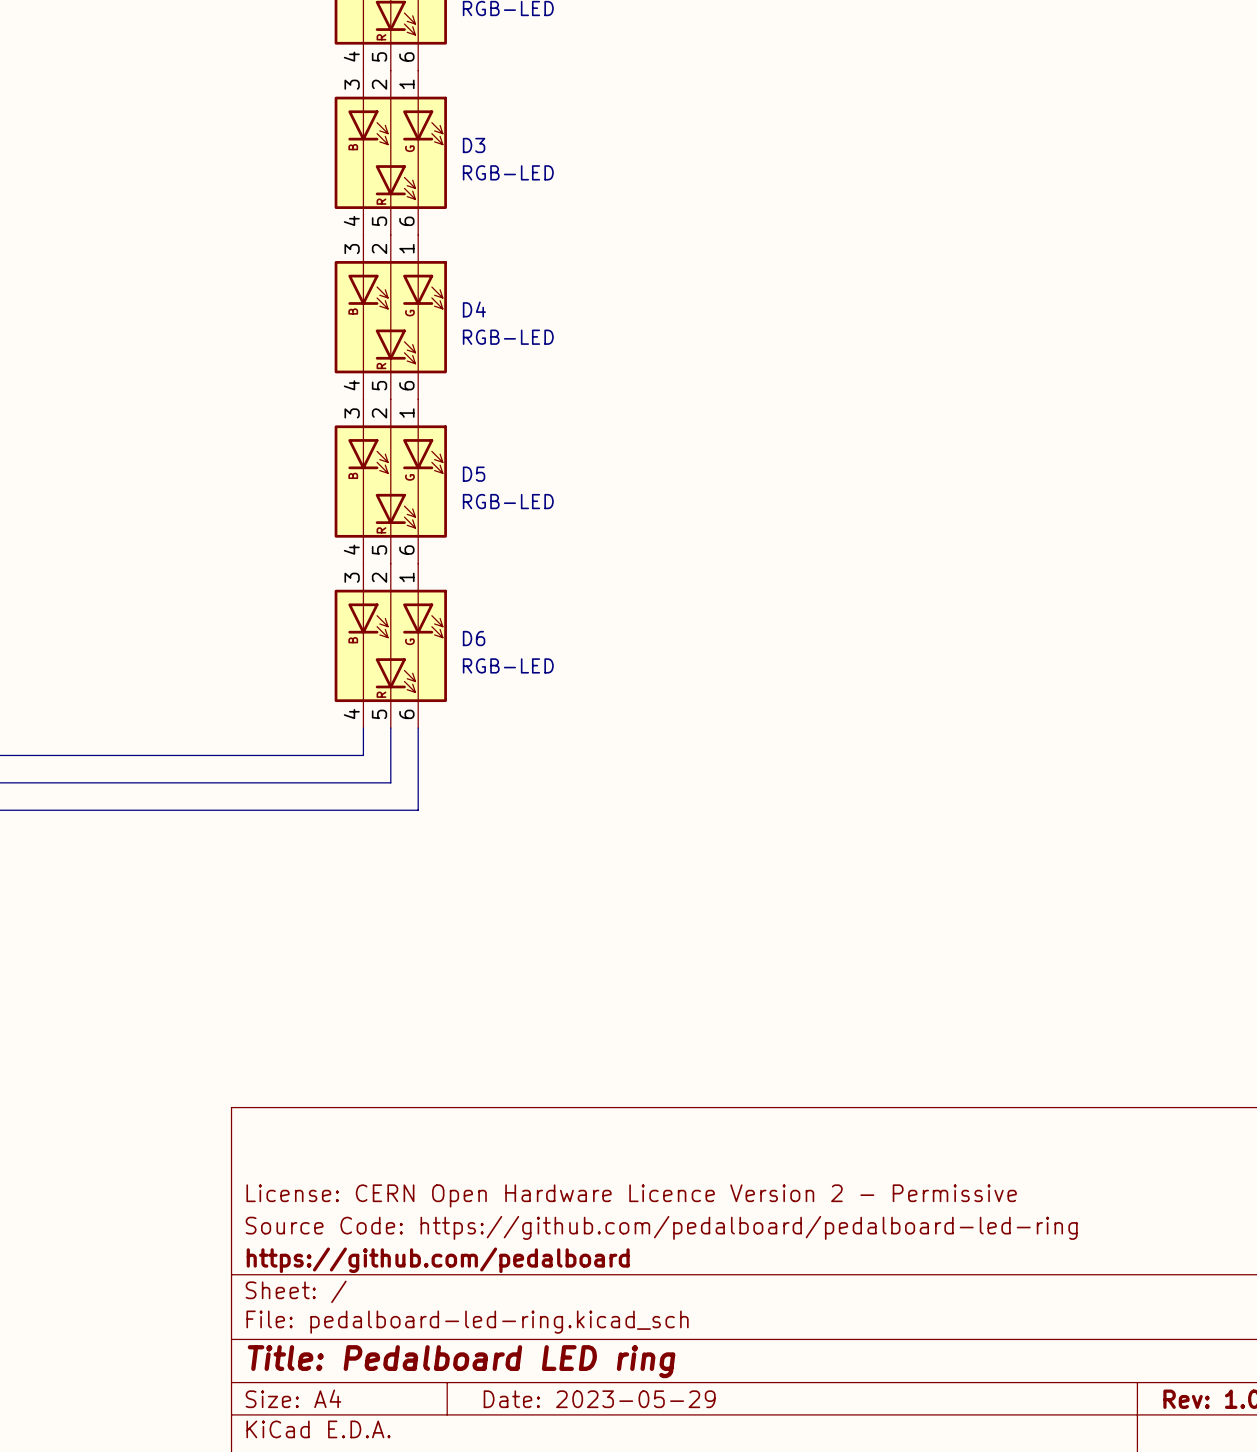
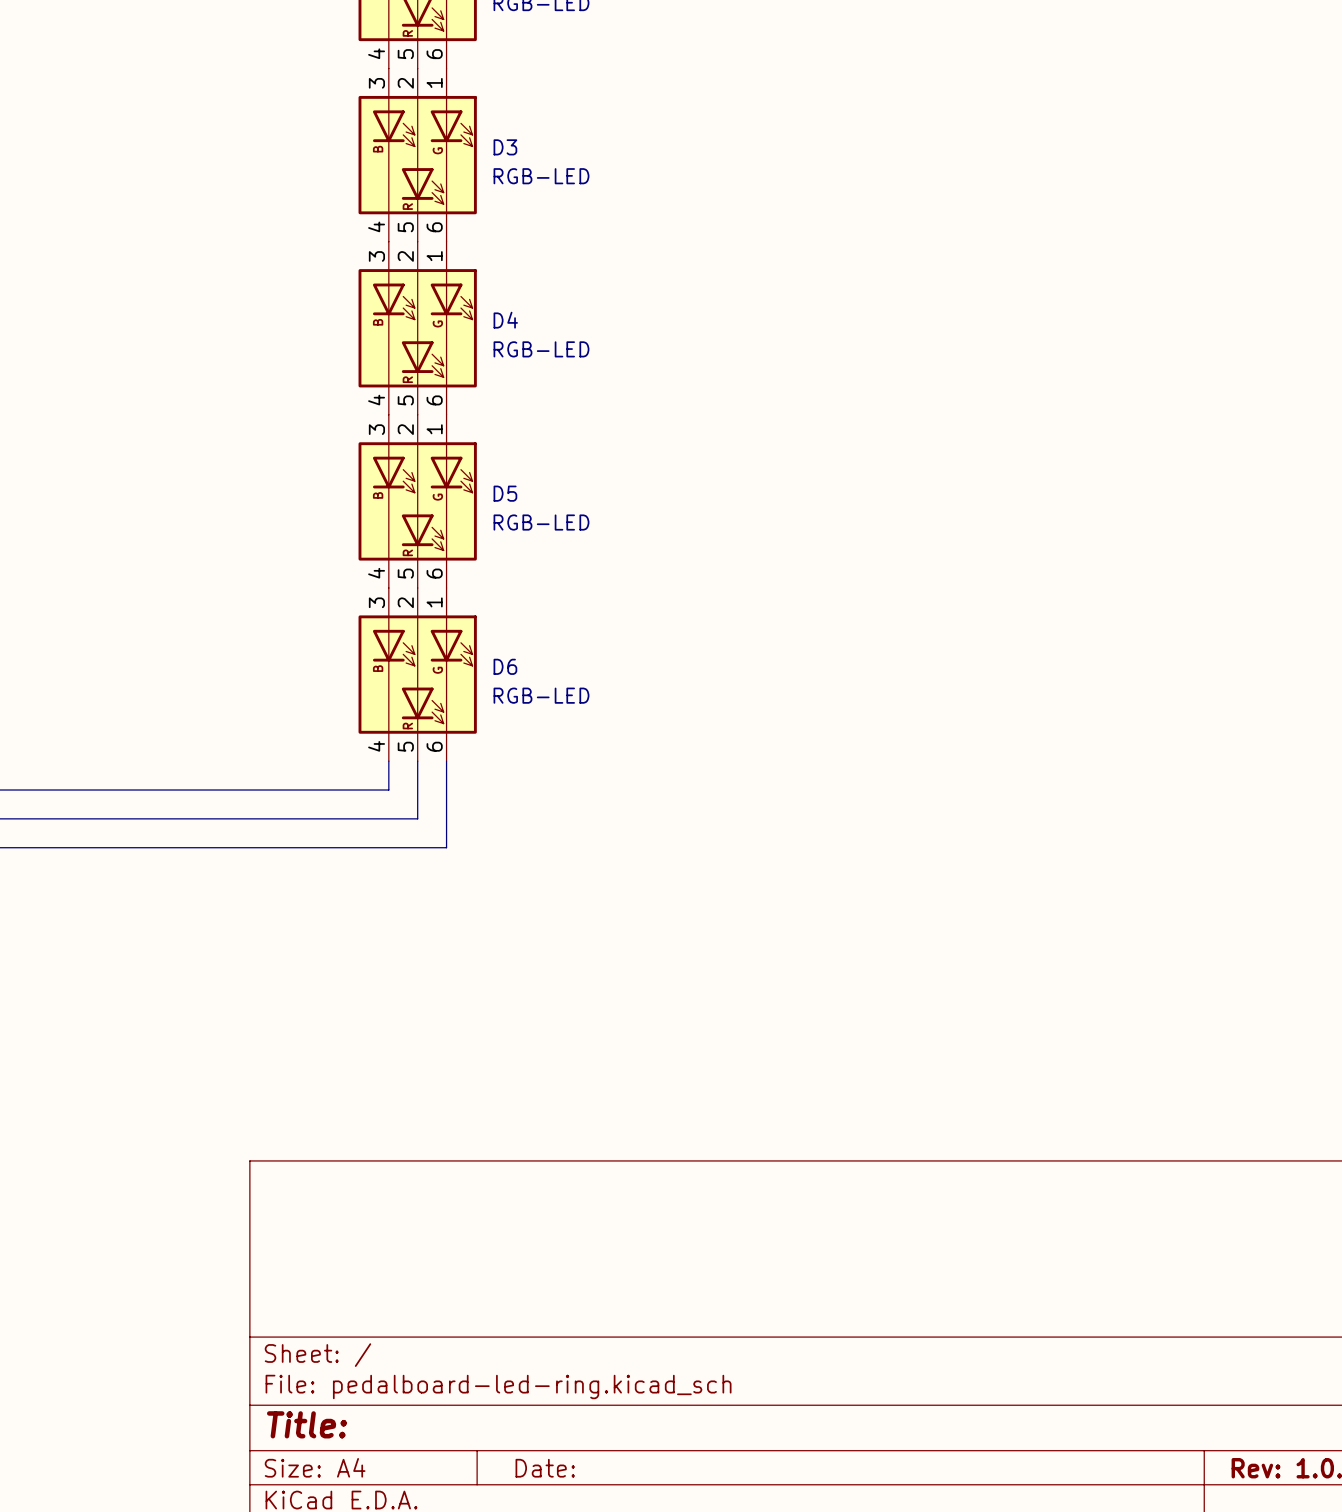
title block: License: CERN Open Hardware Licence Version 2 - Permissive (631, 1195) -> none
title block: Source Code: https://github.com/pedalboard/pedalboard-led-ring (661, 1227) -> none
title block: https://github.com/pedalboard (438, 1260) -> none
title block: Title: Pedalboard LED ring (461, 1361) -> Title: (307, 1424)
title block: Date: 2023-05-29 (599, 1399) -> Date: (545, 1468)

